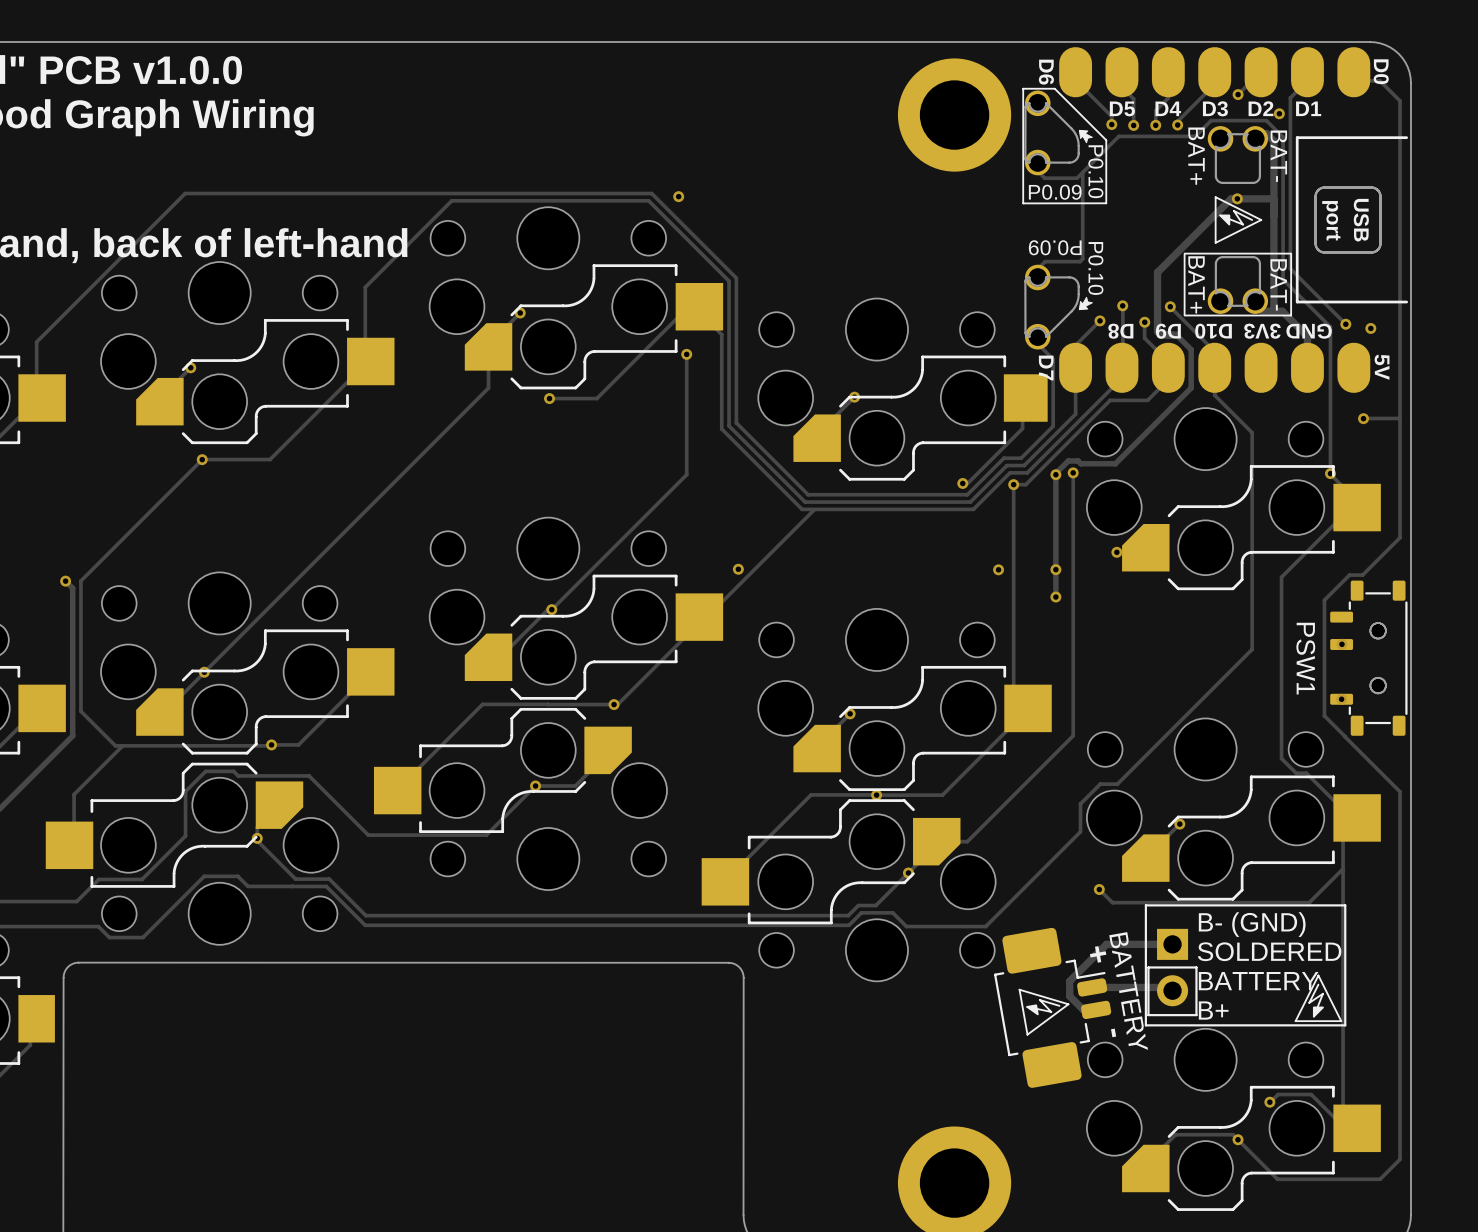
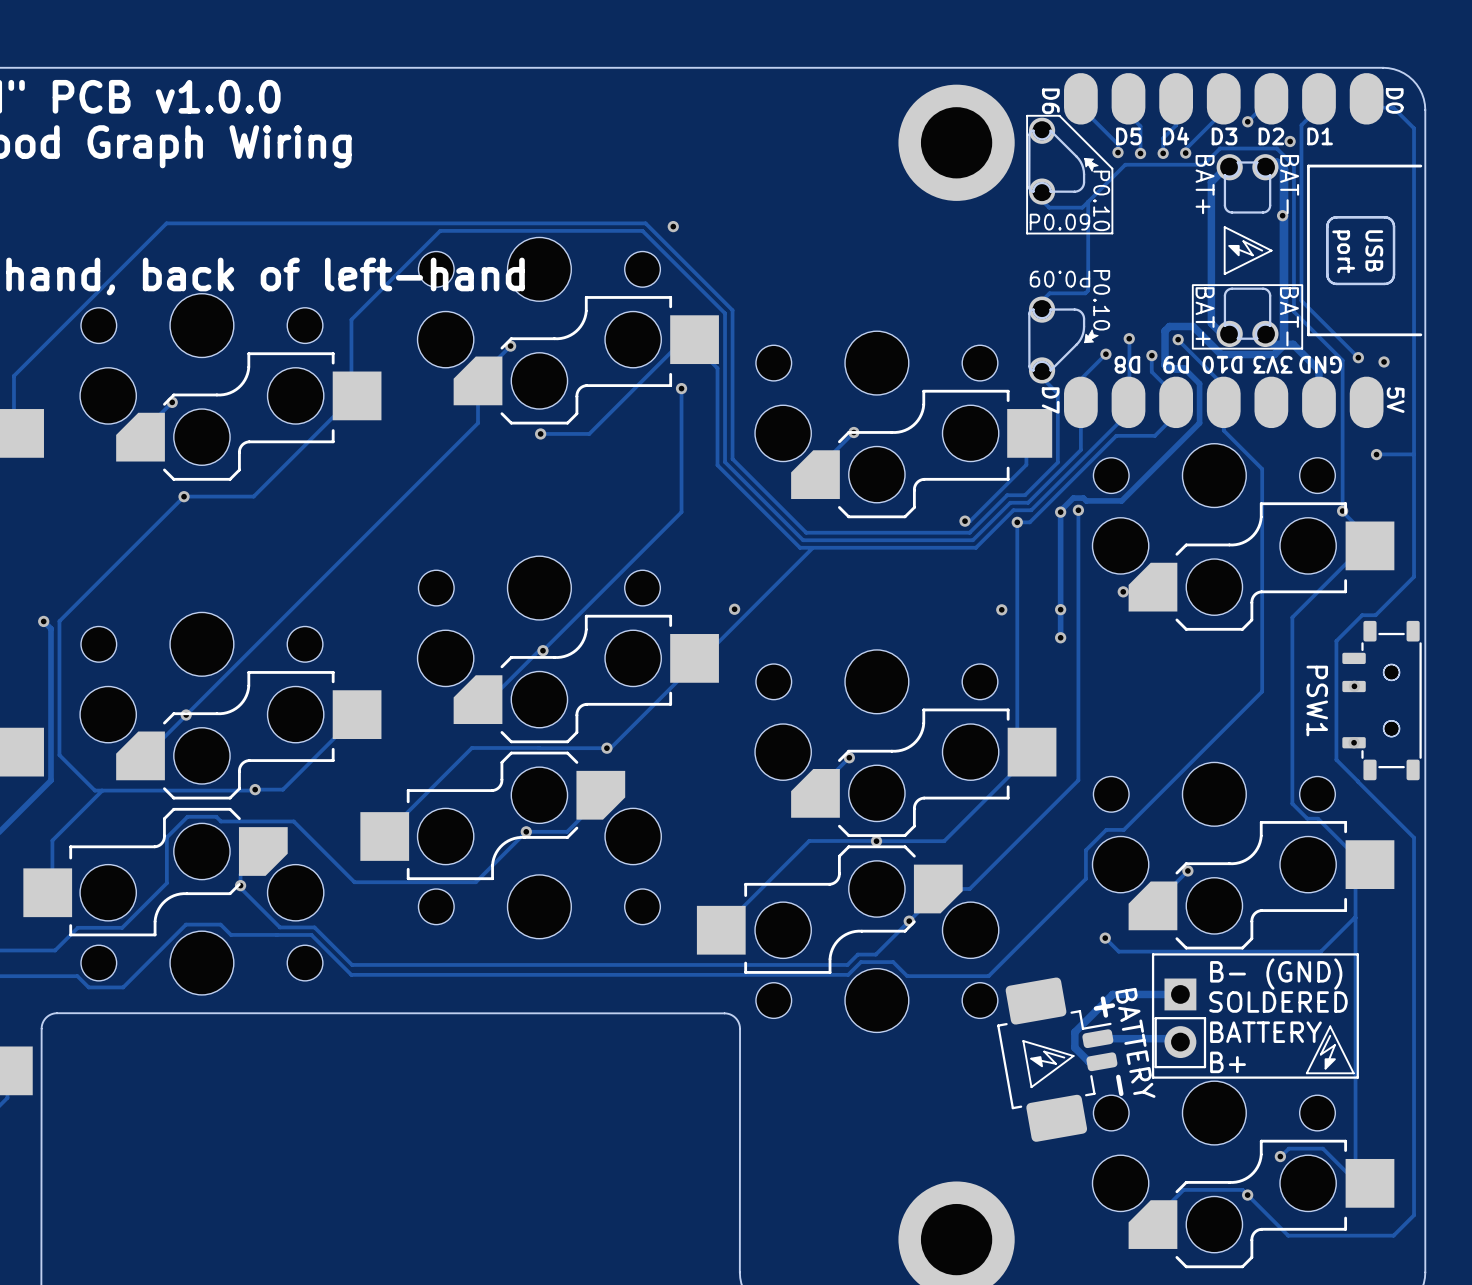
track: none -> (1220, 173) (1211, 182) (1211, 323) (1221, 333)
via position: (1237, 198) -> (1282, 215)
track: (1273, 215) (1273, 198) (1231, 198) (1157, 272) (1157, 298) -> (1283, 168) (1283, 345) (1274, 354) (1221, 354) (1193, 326) (1169, 326) (1165, 331)

